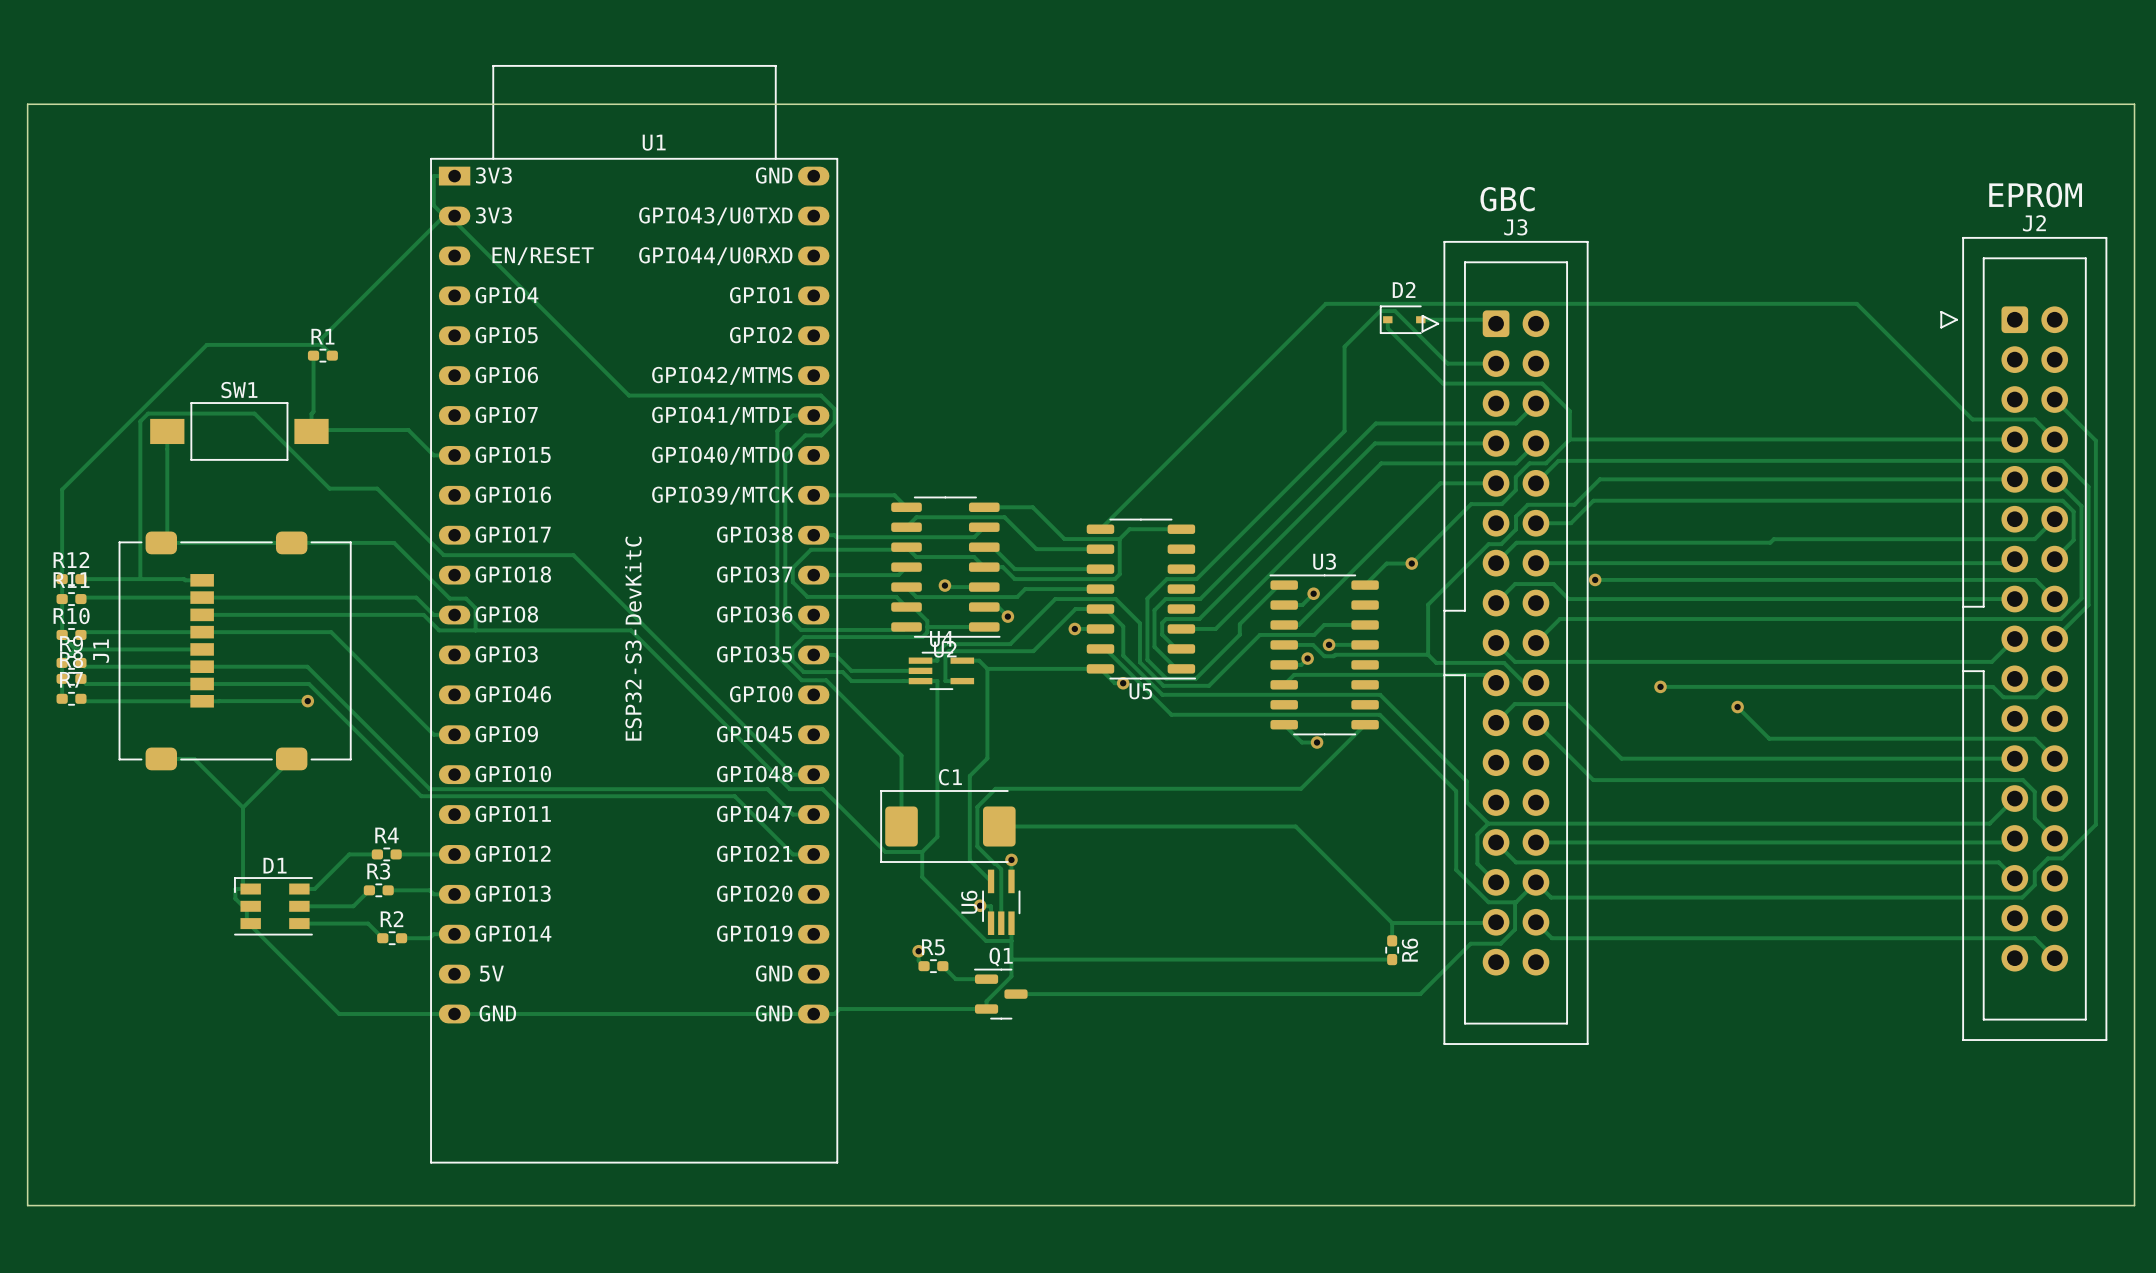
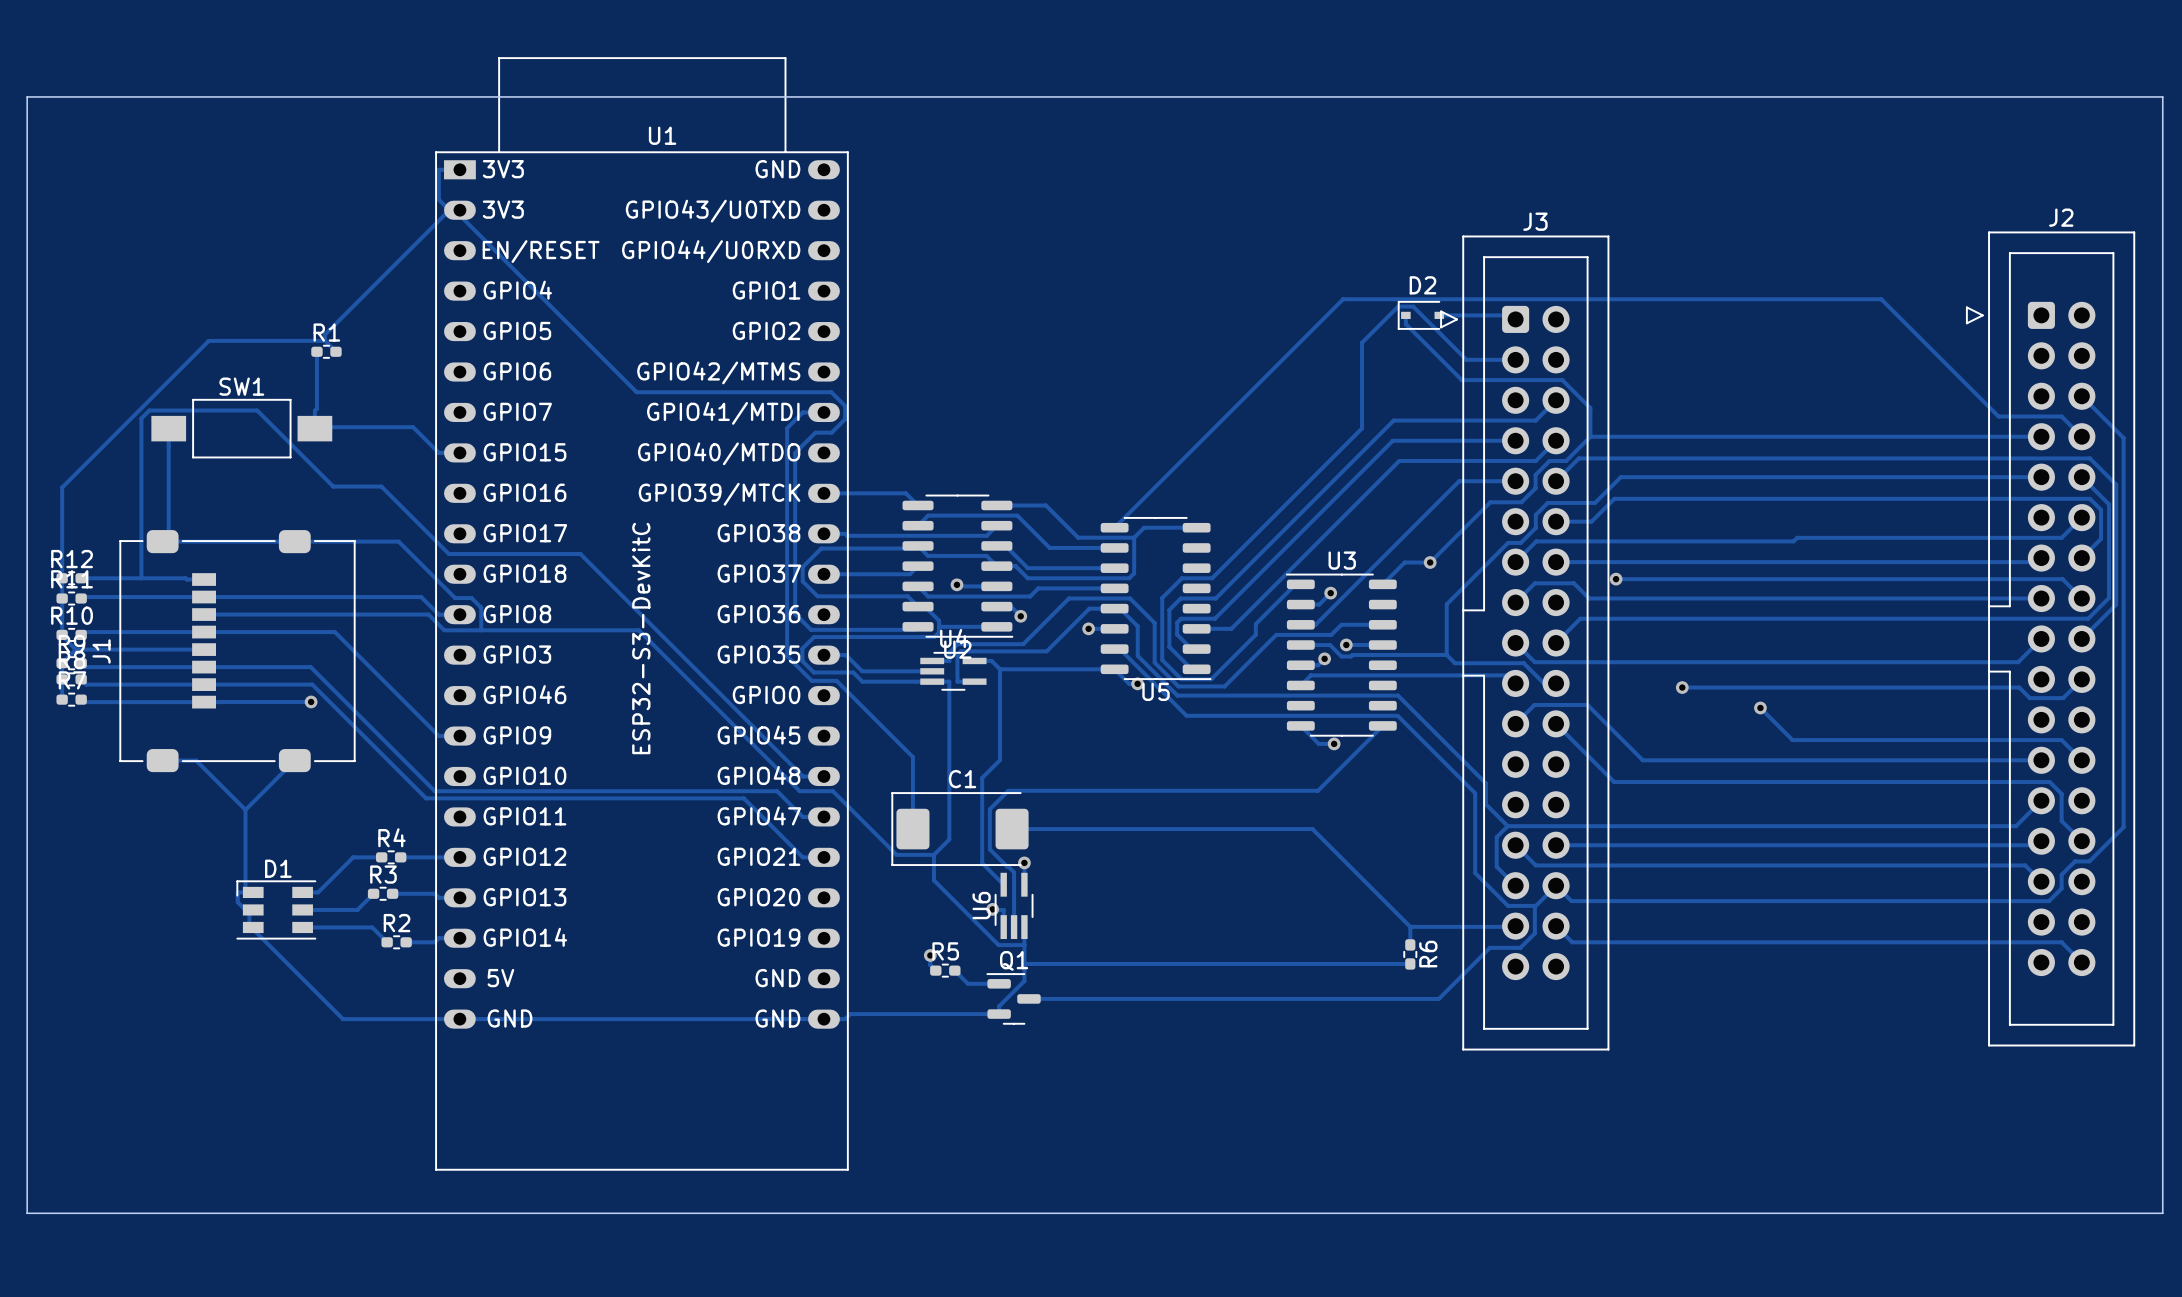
text: EPROM (2035, 195) -> none
text: GBC (1507, 199) -> none

